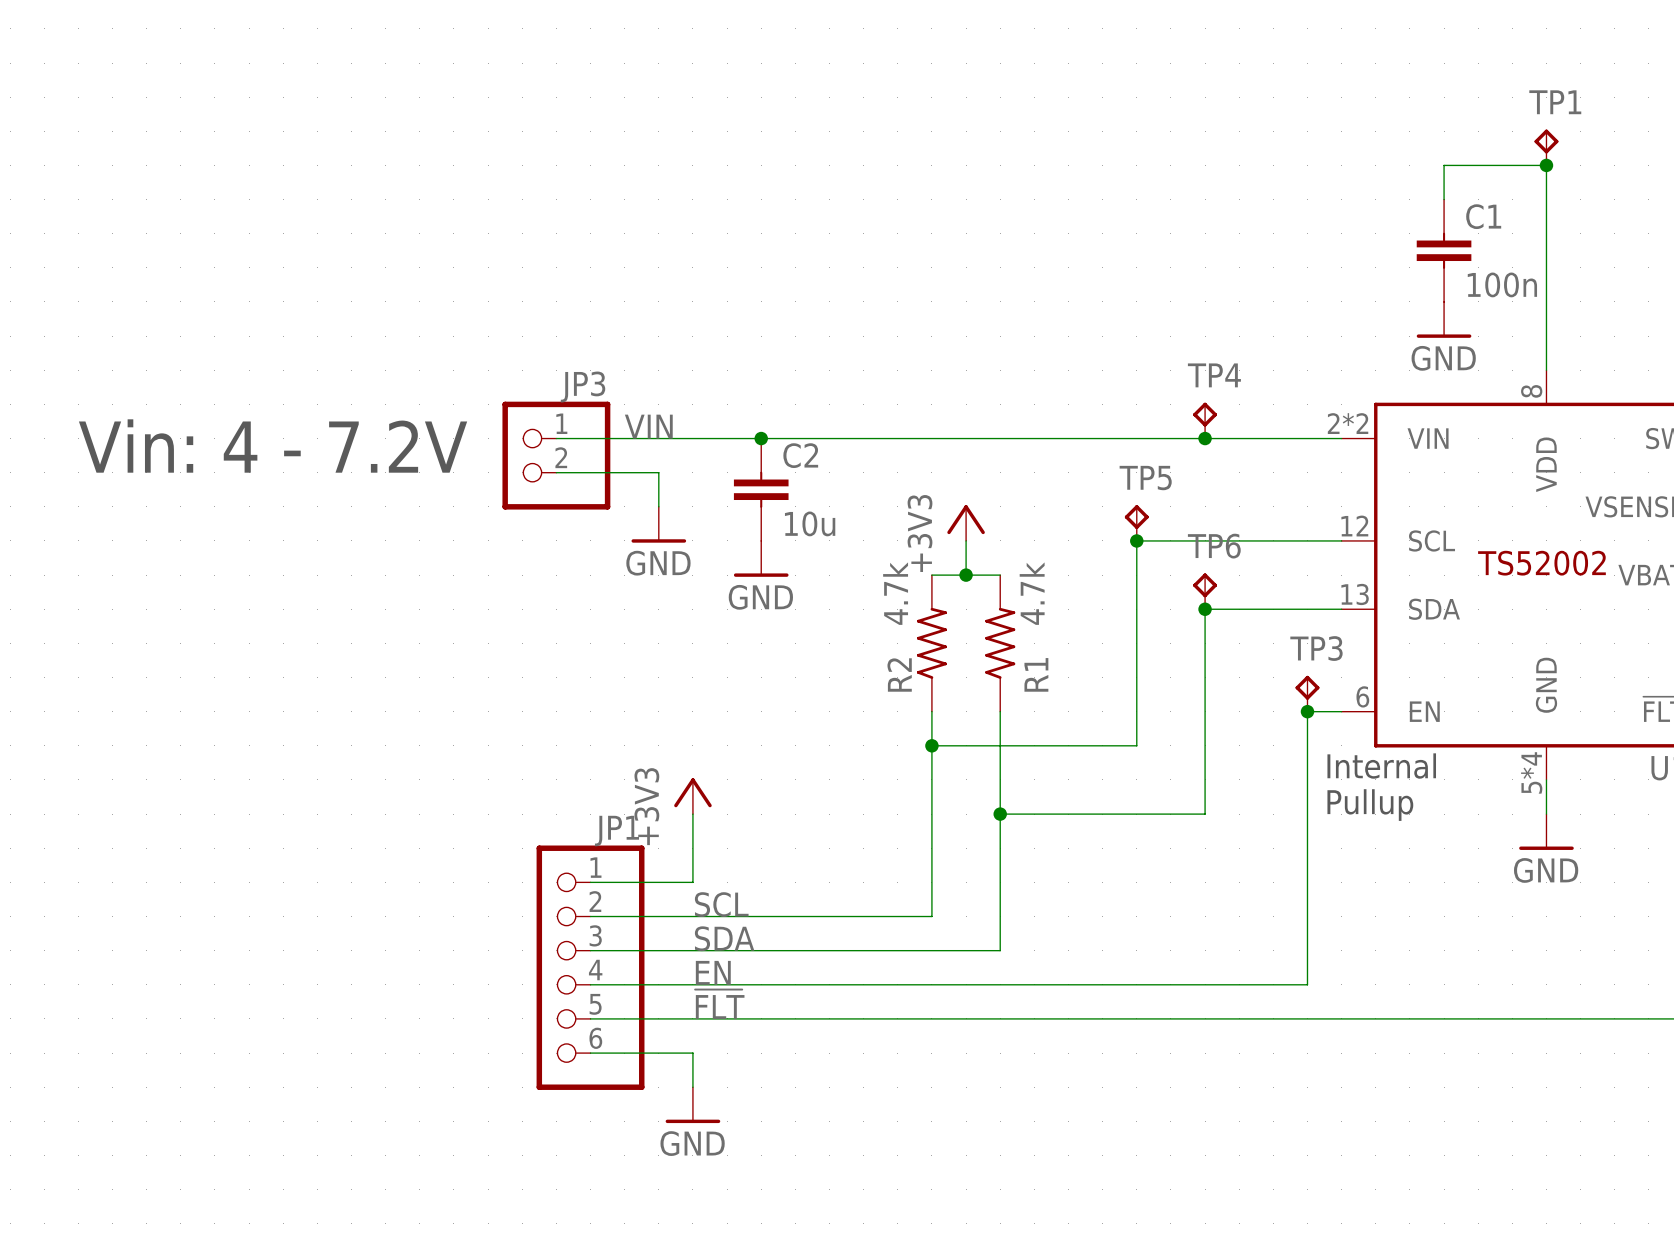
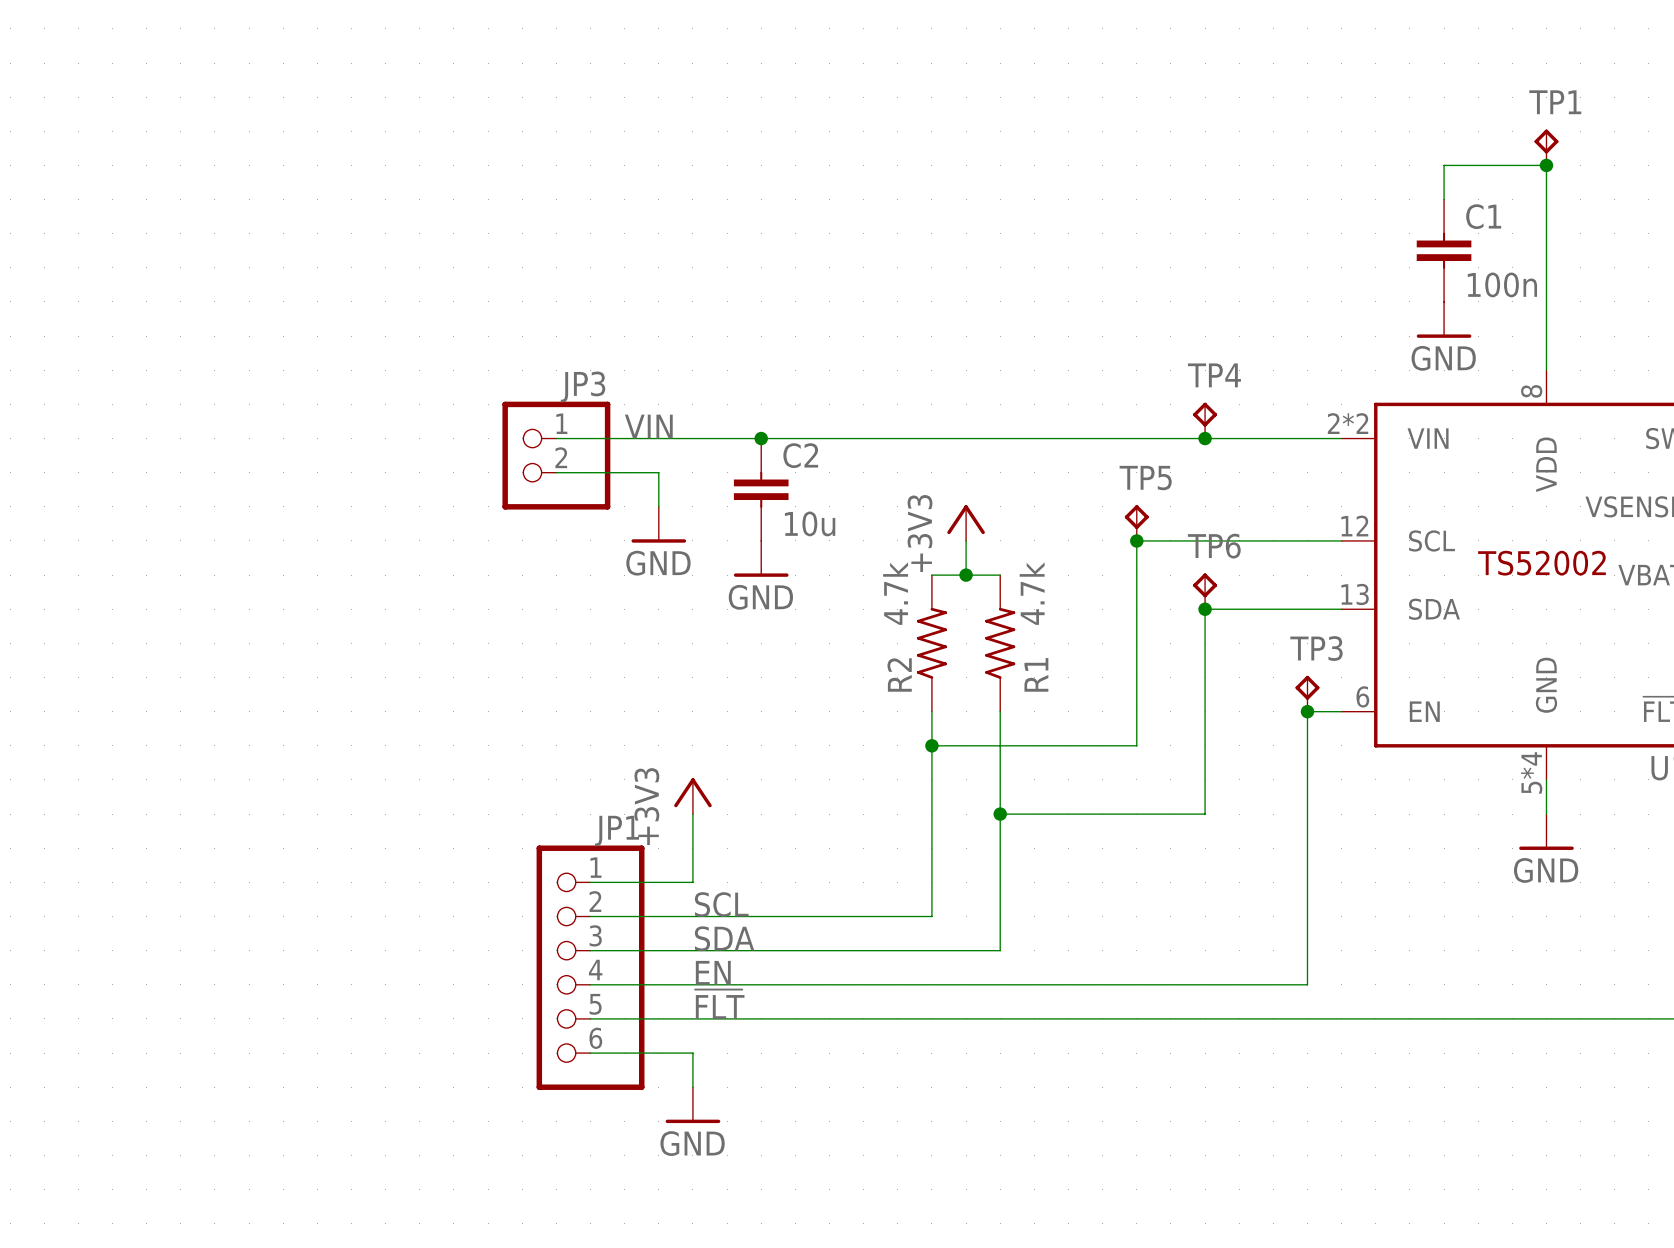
text: Vin: 4 - 7.2V (273, 446) -> none
text: Internal (1381, 766) -> none
text: Pullup (1370, 805) -> none

